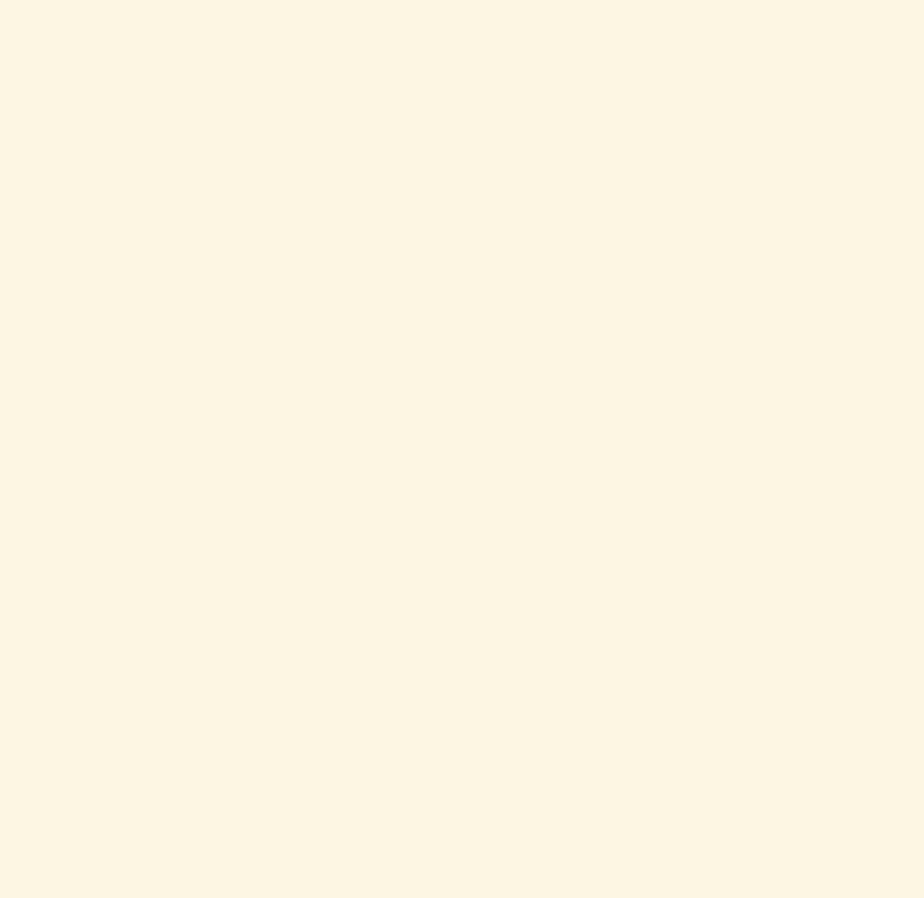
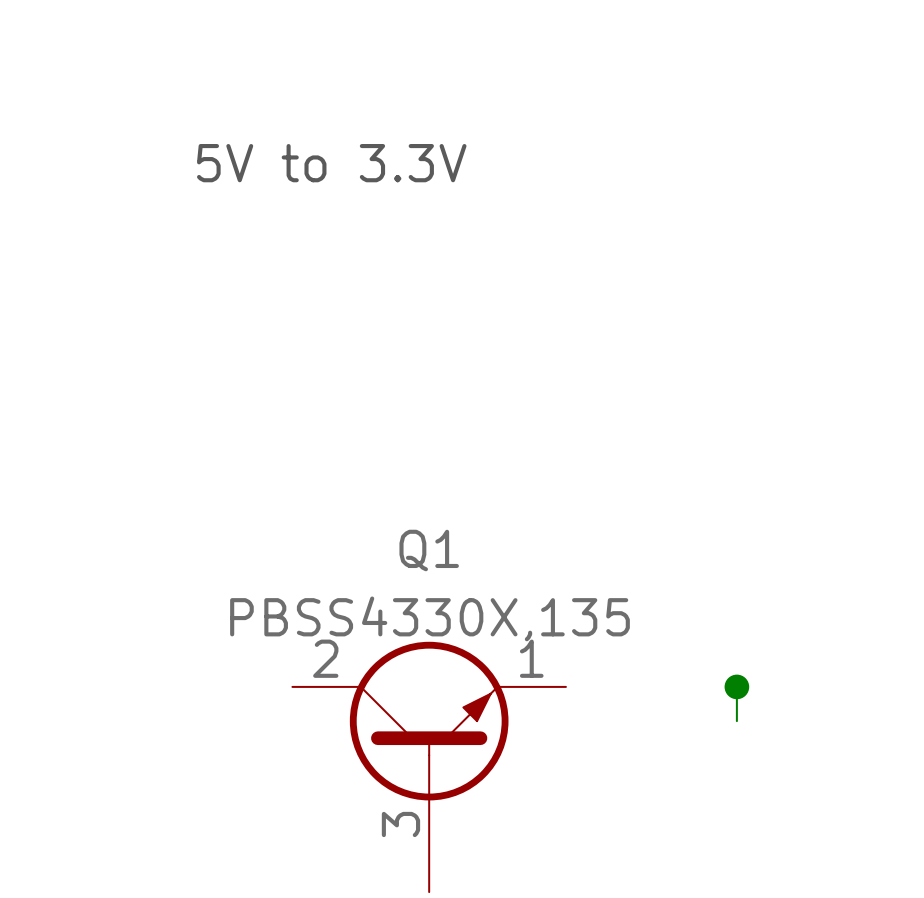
text: none -> 5V to 3.3V (331, 163)
wire: none -> (736, 686) (736, 721)
junction: none -> (736, 686)
Q1: none -> PBSS4330X,135 (429, 766)

